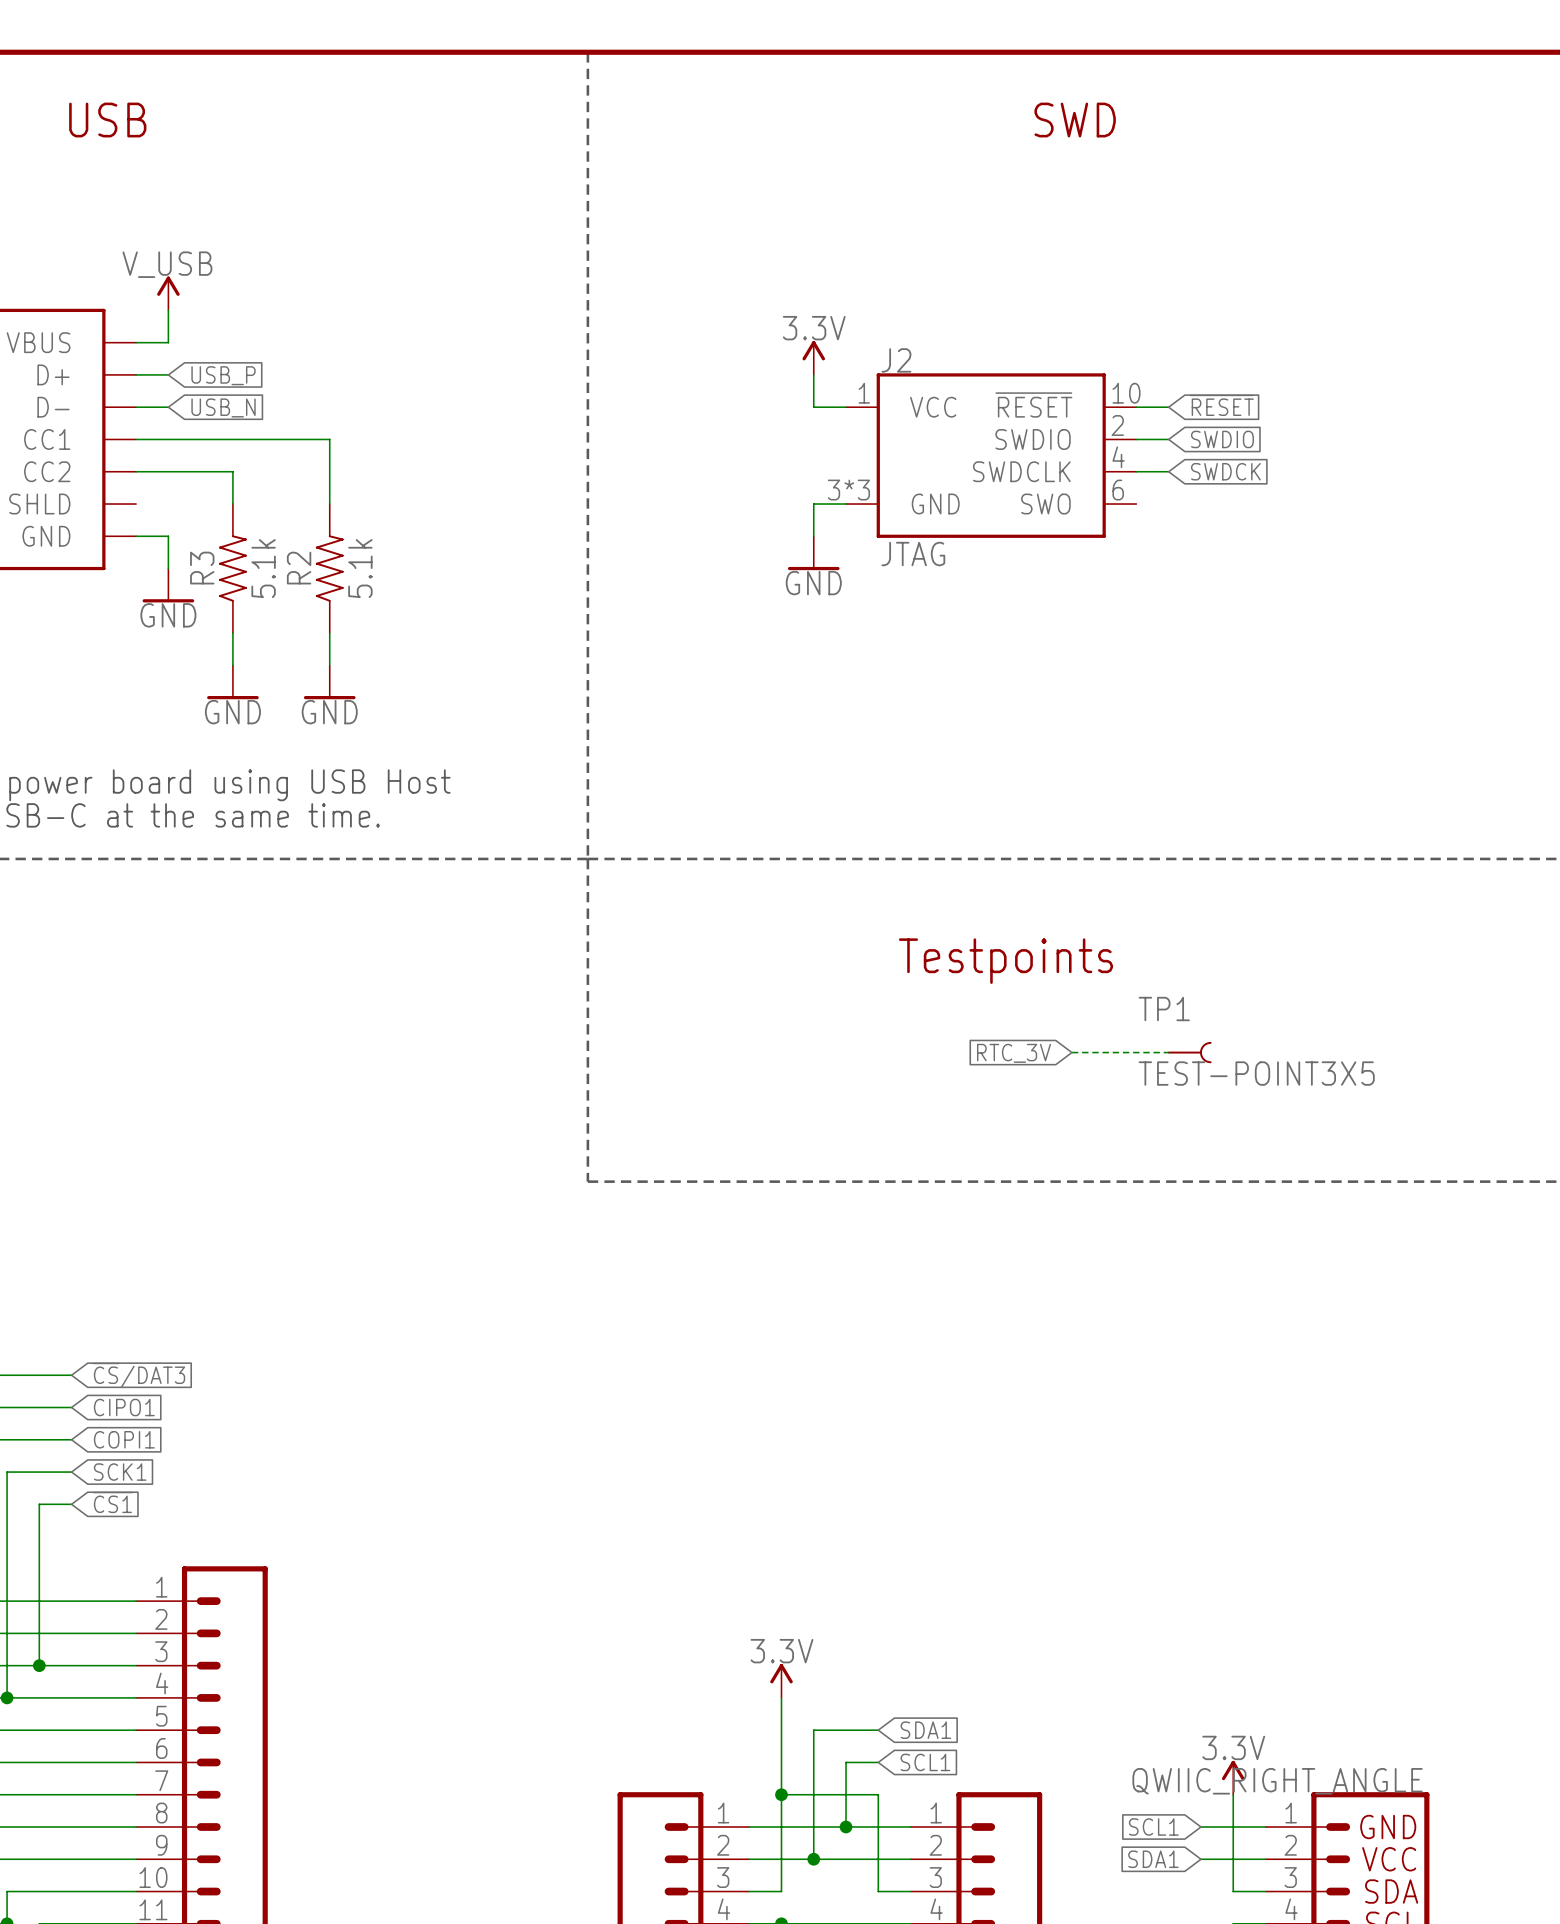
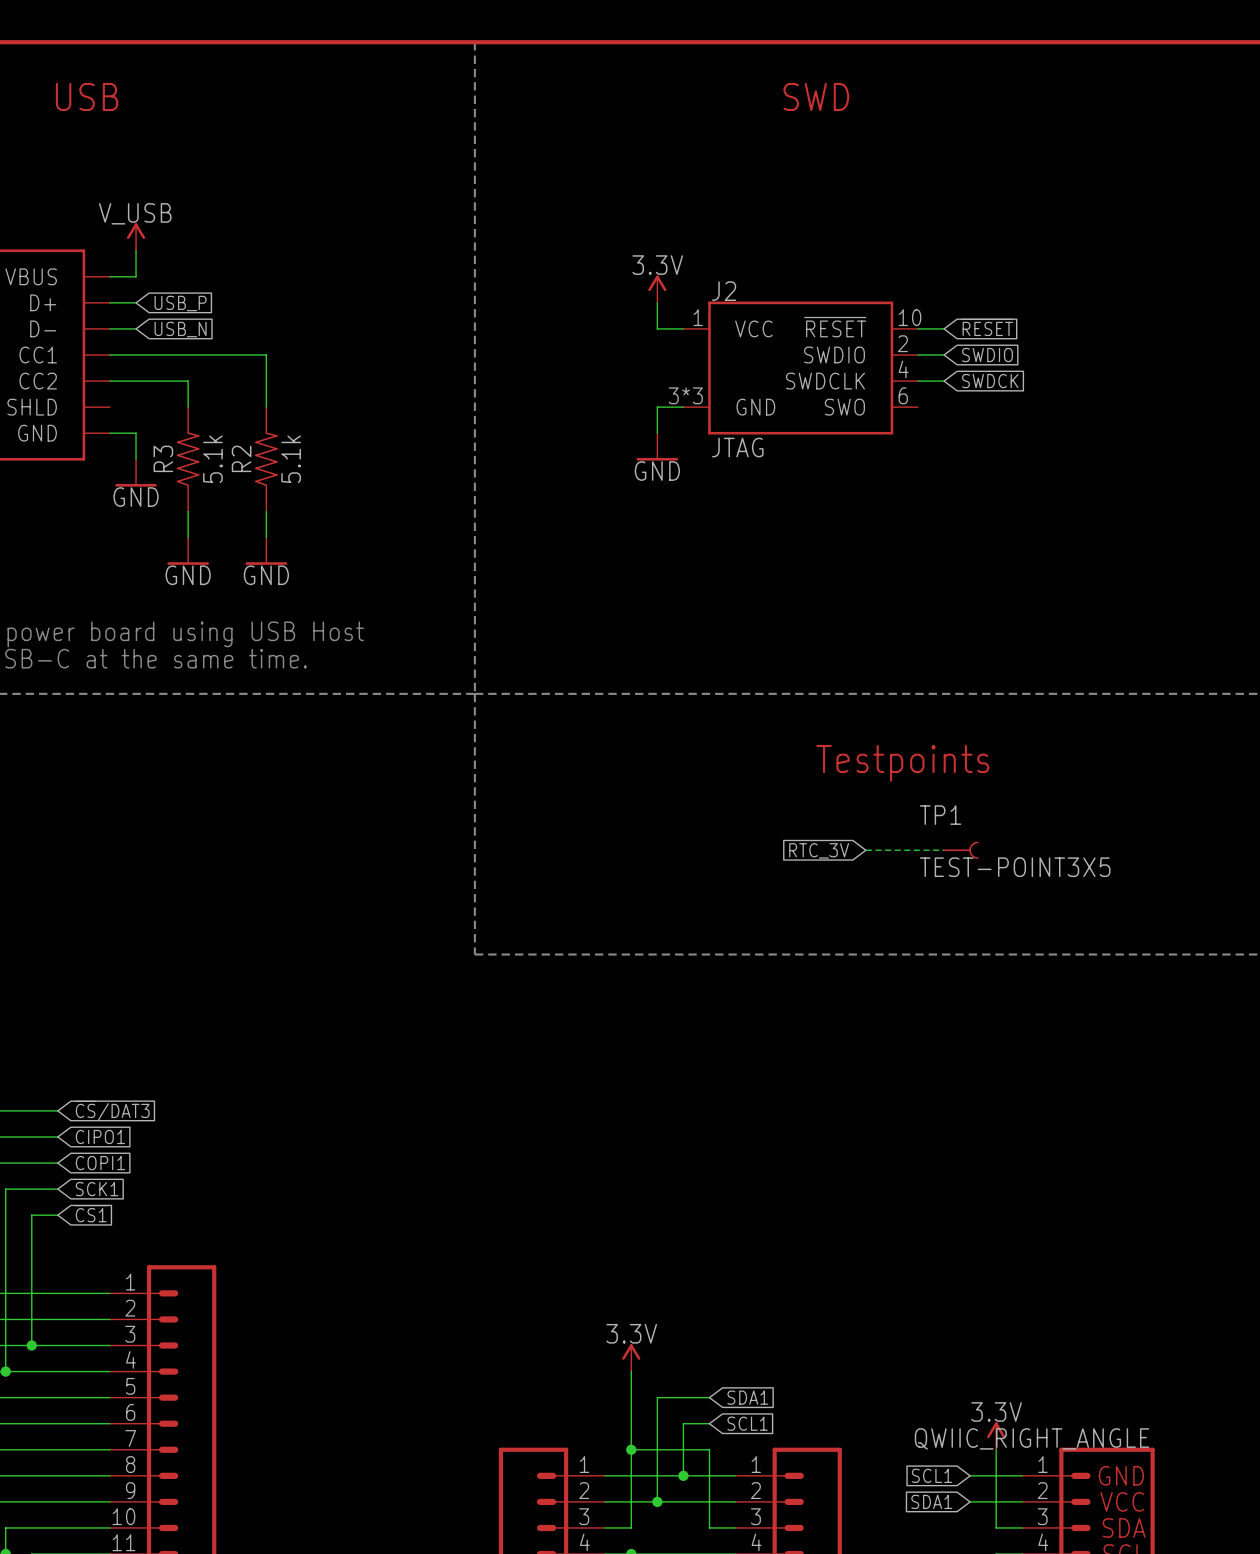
text position: SWD (1075, 120) -> SWD (816, 96)
text position: Testpoints (1005, 961) -> Testpoints (902, 763)

